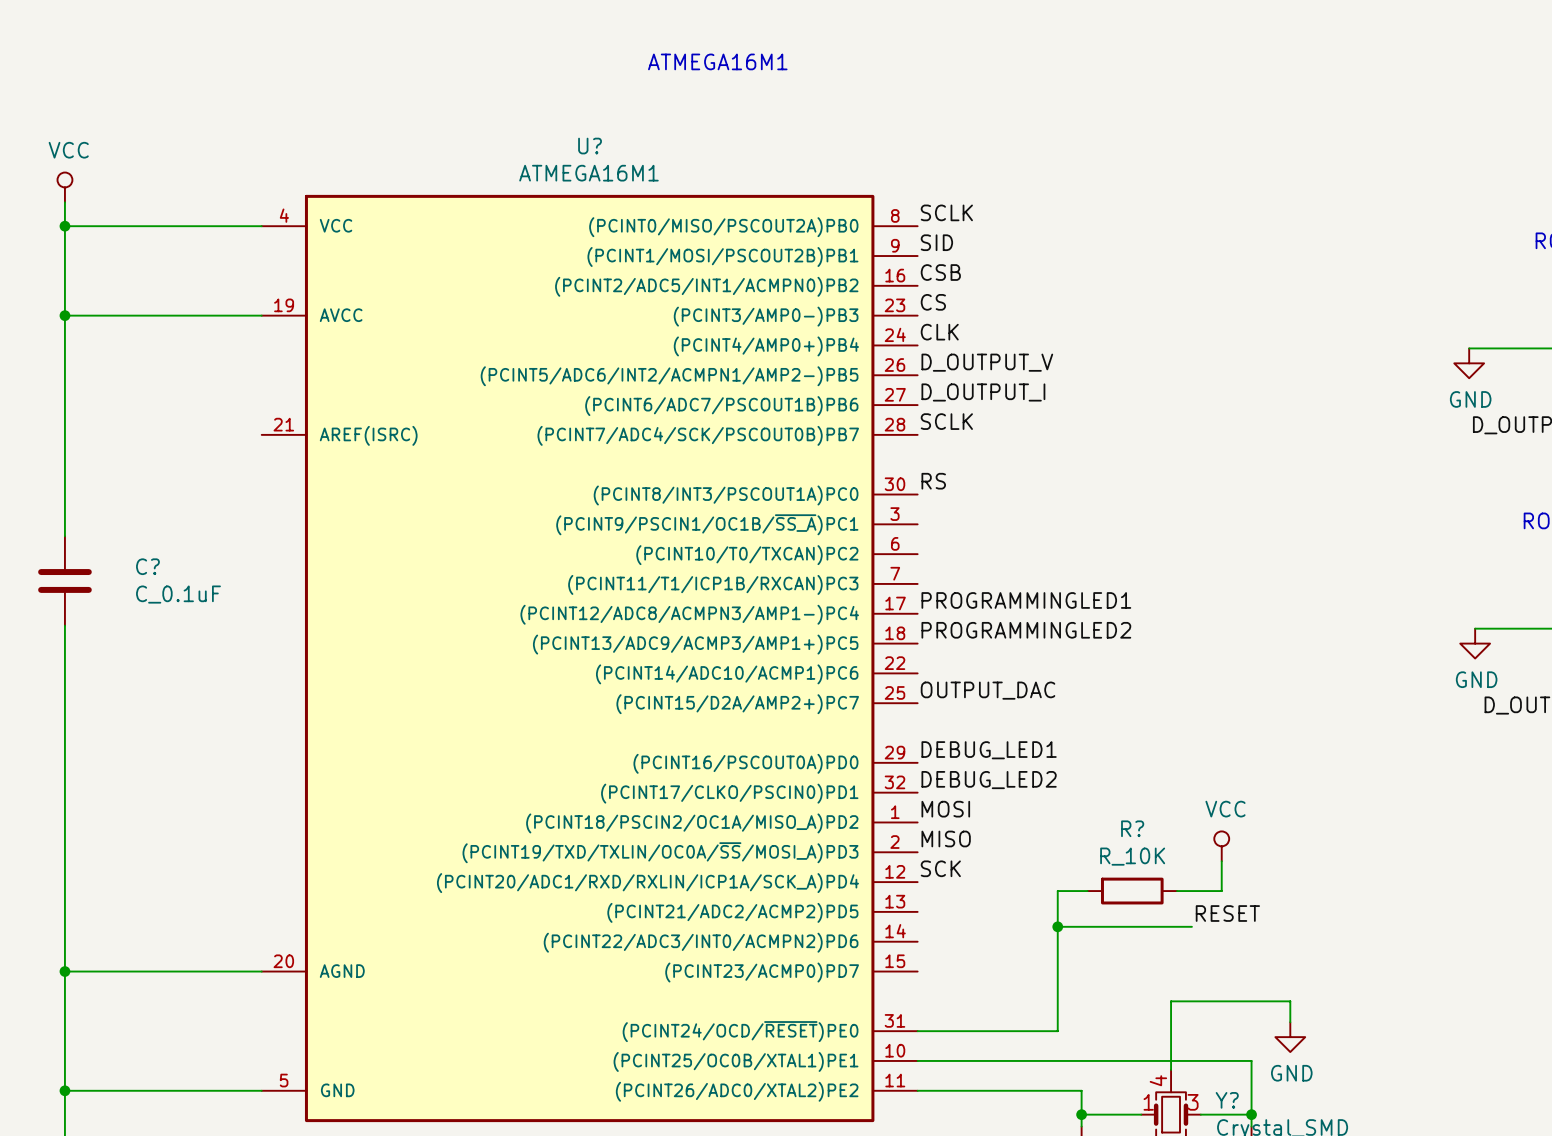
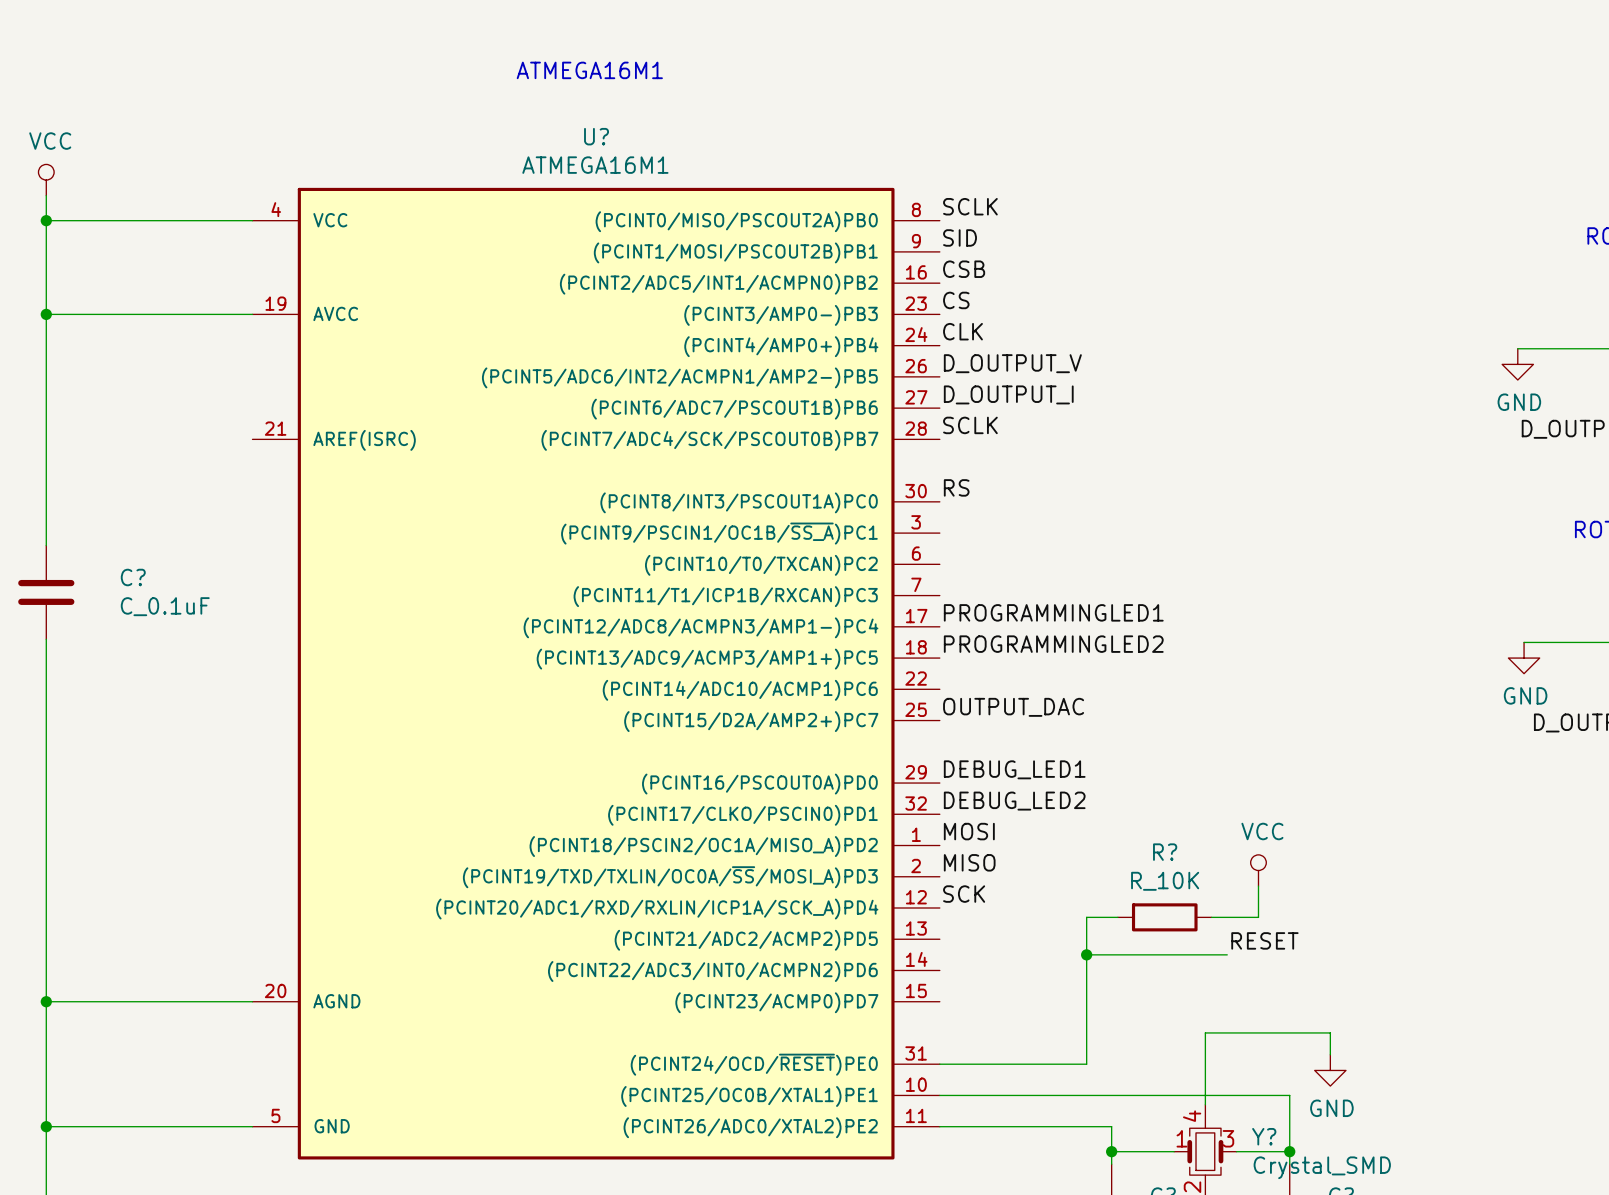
text position: ATMEGA16M1 (717, 61) -> ATMEGA16M1 (589, 70)

